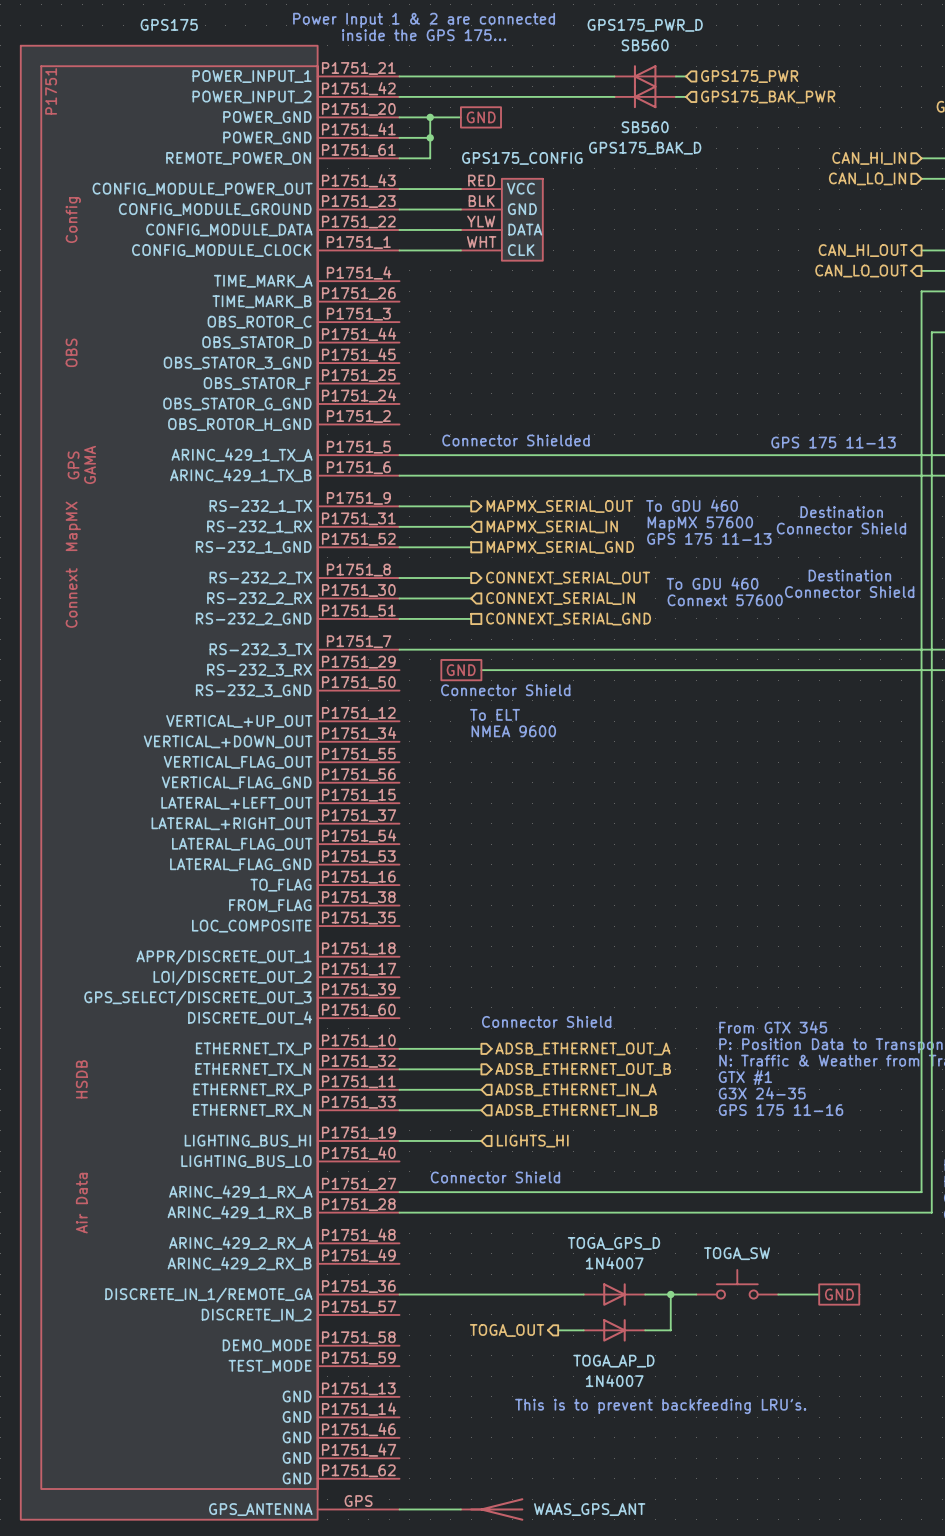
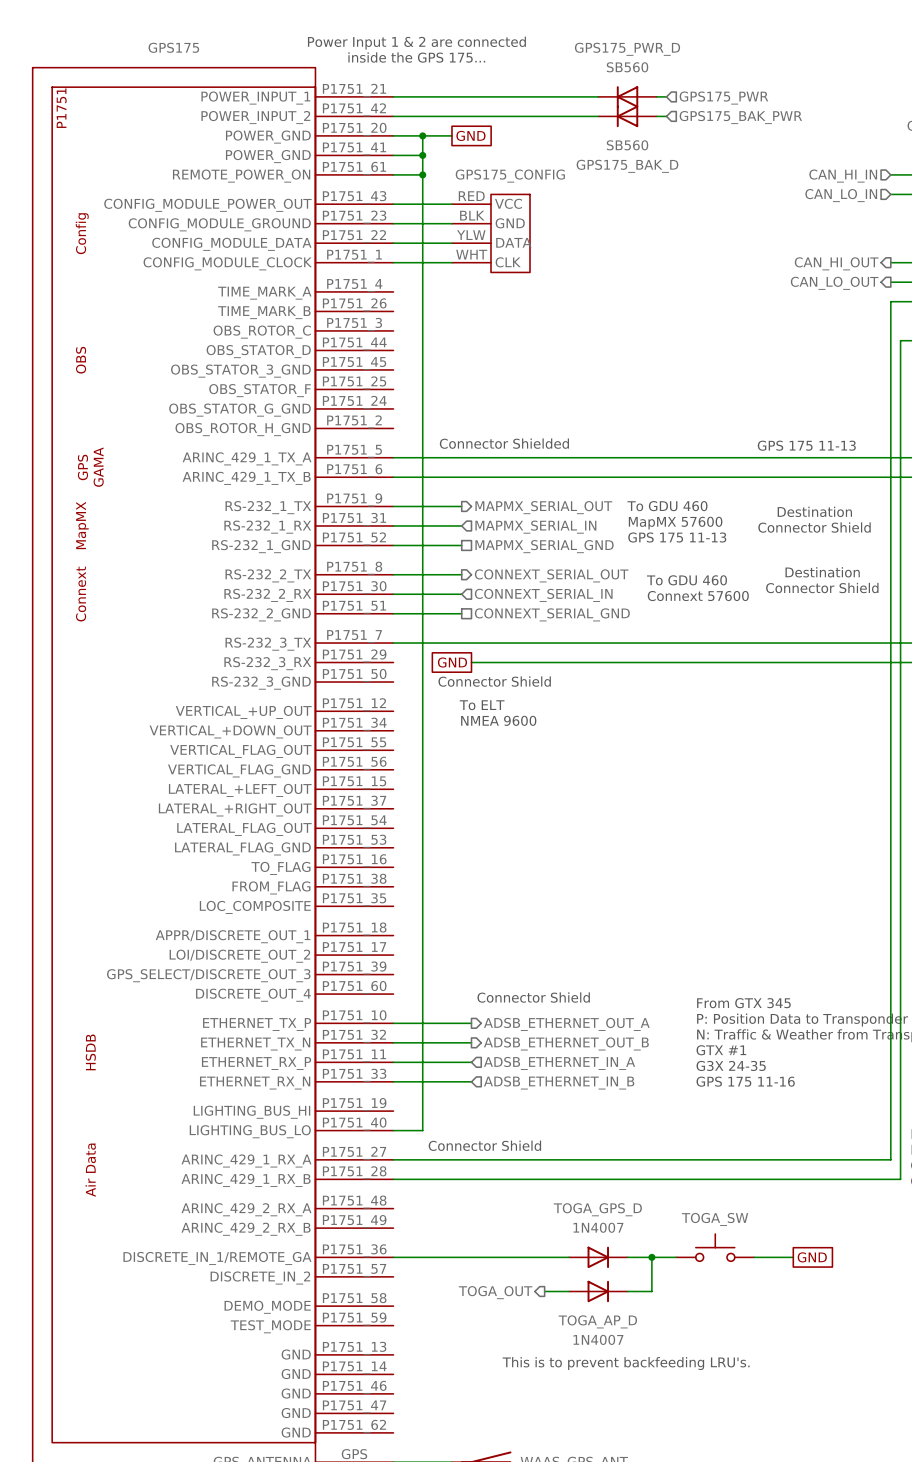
wire: none -> (422, 174) (422, 1130) (393, 1130)
junction: none -> (422, 174)
wire: (399, 1140) (481, 1140) -> none
hierarchical label: LIGHTS_HI (532, 1141) -> none

